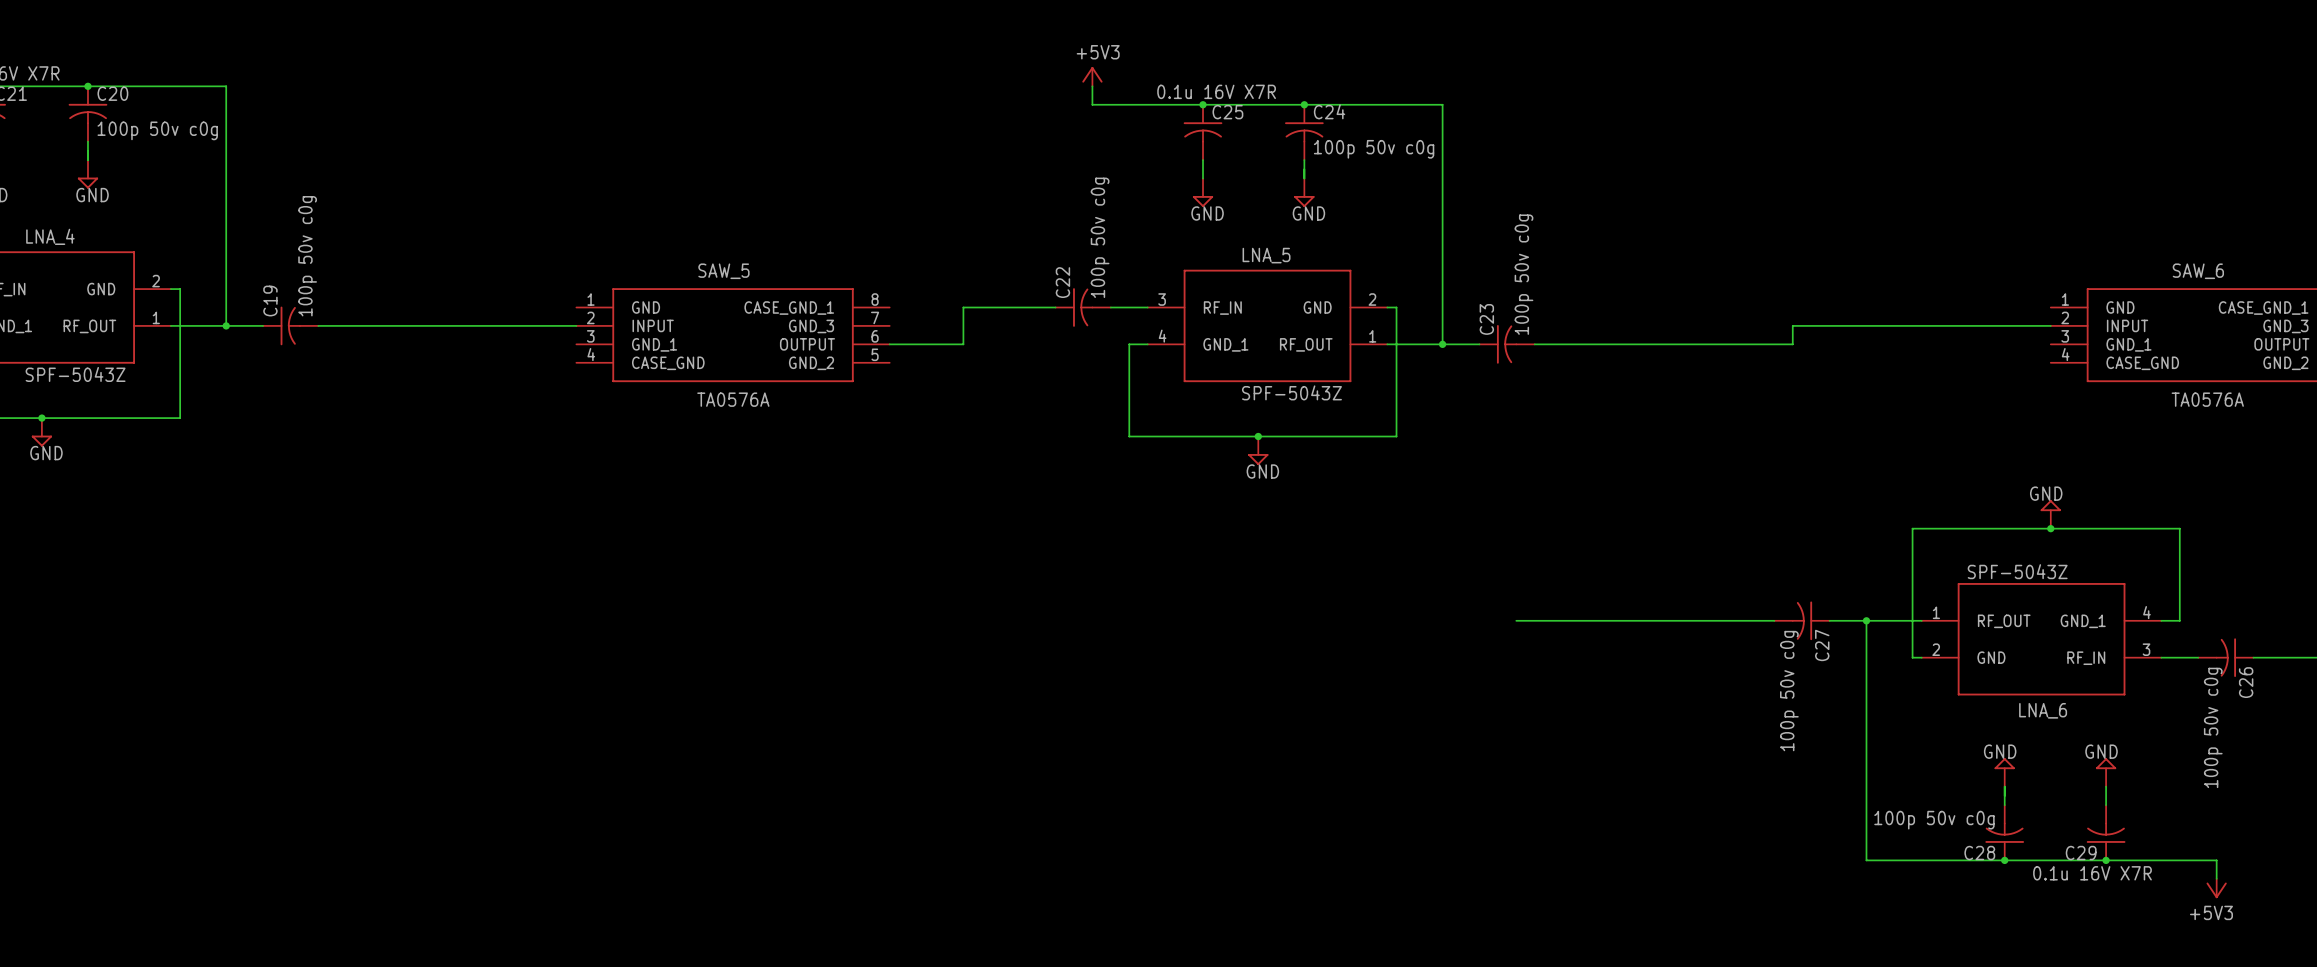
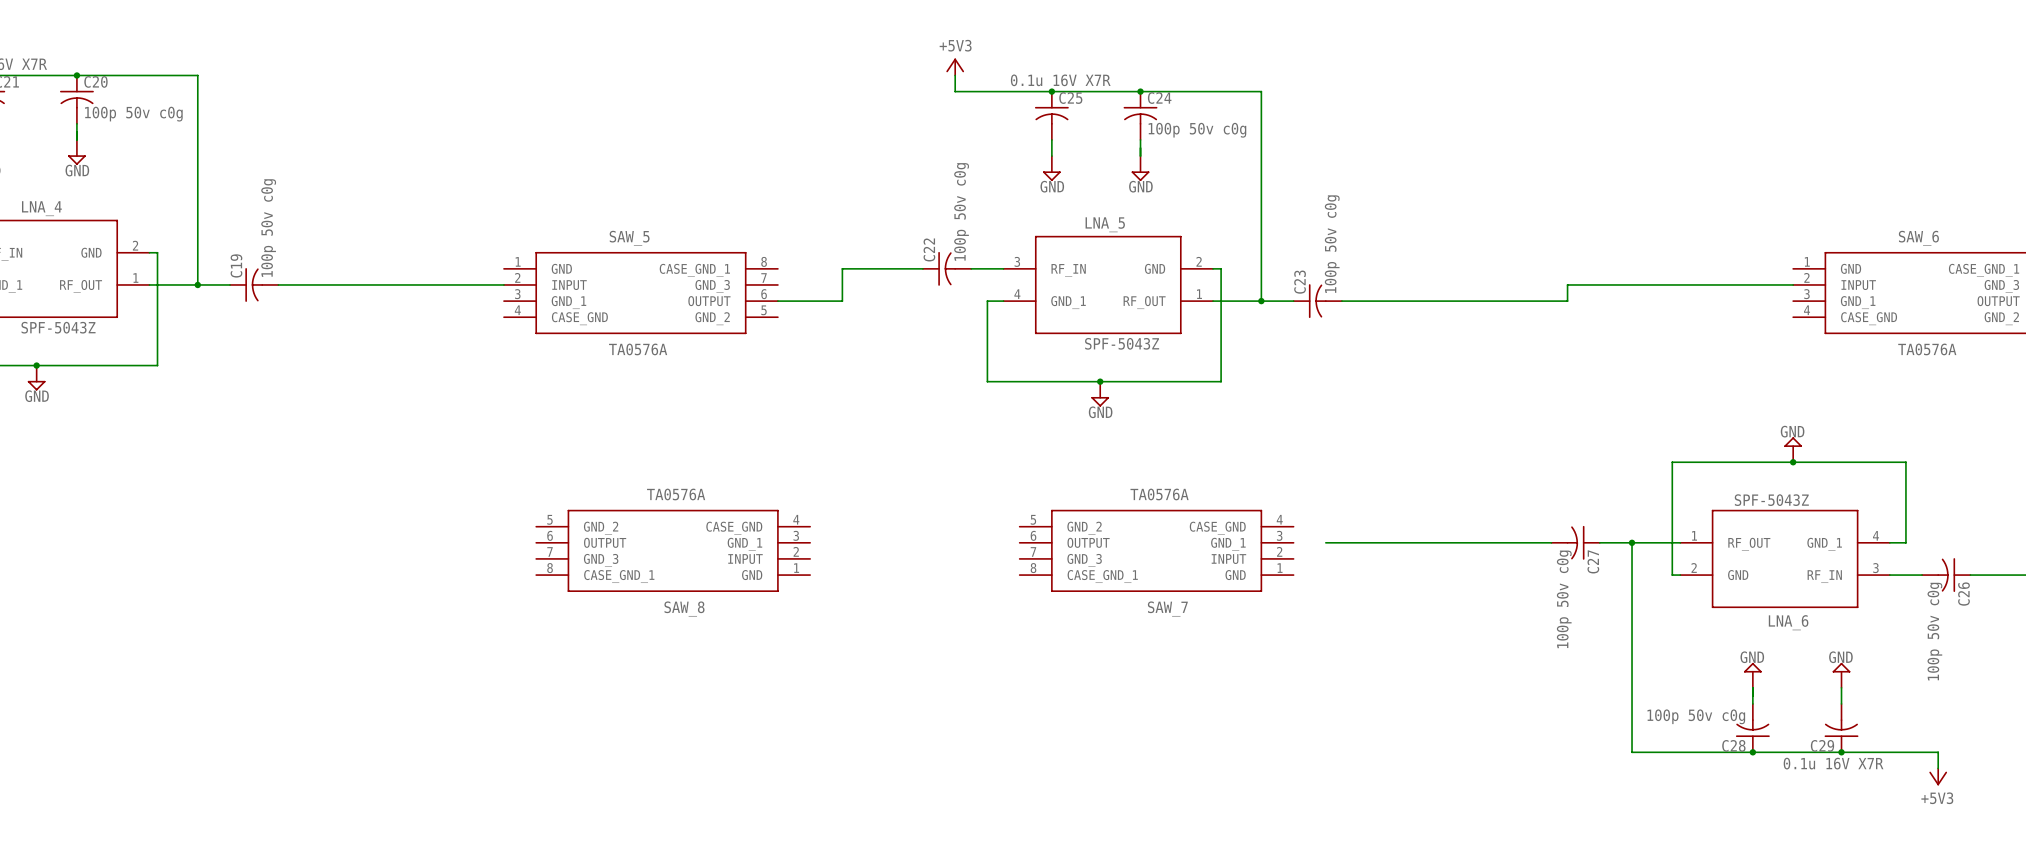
SAW_8: none -> TA0576A (673, 550)
SAW_7: none -> TA0576A (1156, 550)

